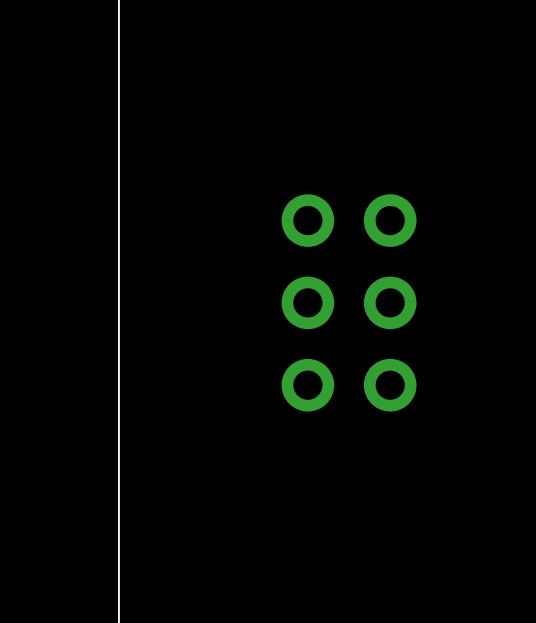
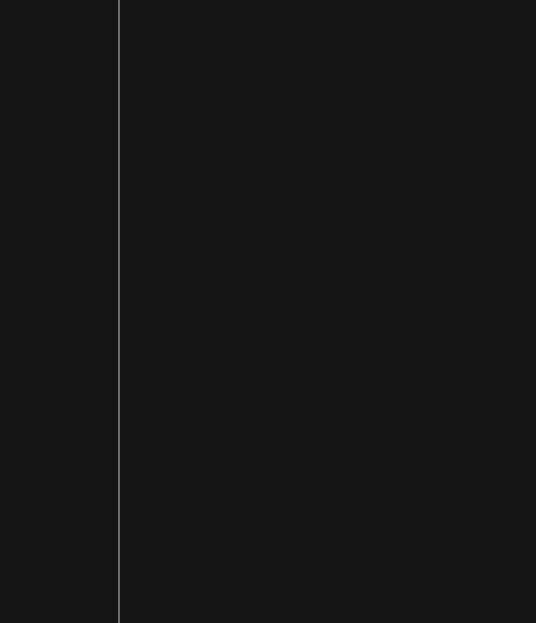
part: (349, 302) -> none

